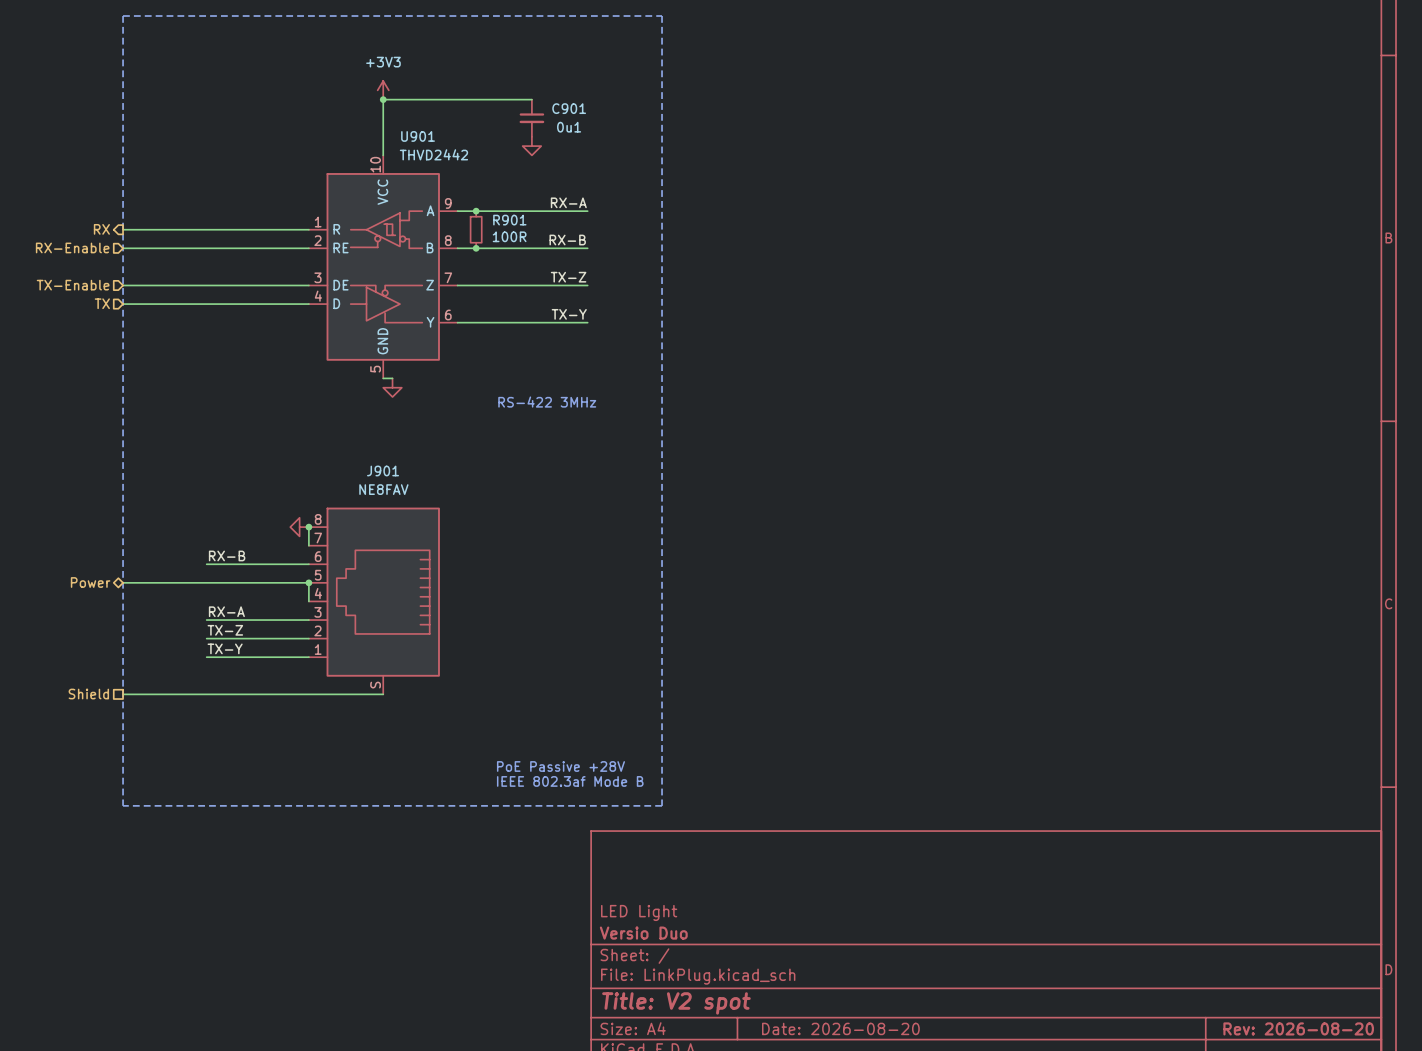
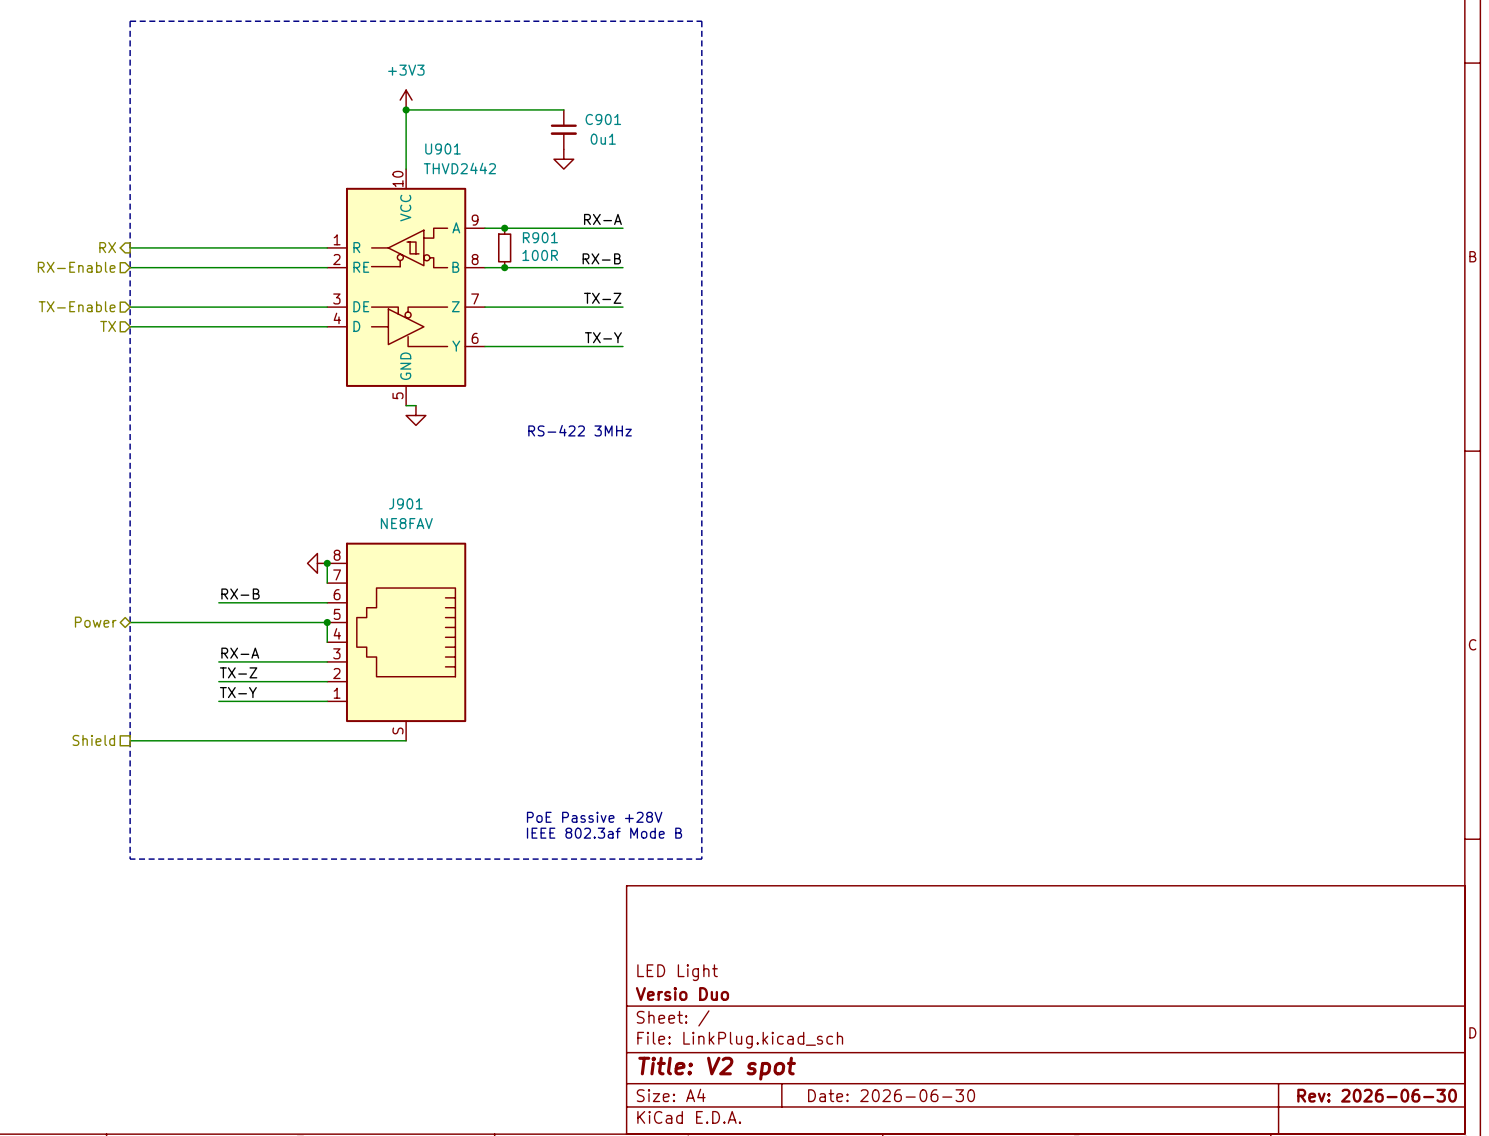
title block: Date: 2026-08-20 (840, 1028) -> Date: 2026-06-30 (891, 1095)
title block: Rev: 2026-08-20 (1298, 1028) -> Rev: 2026-06-30 (1377, 1095)

